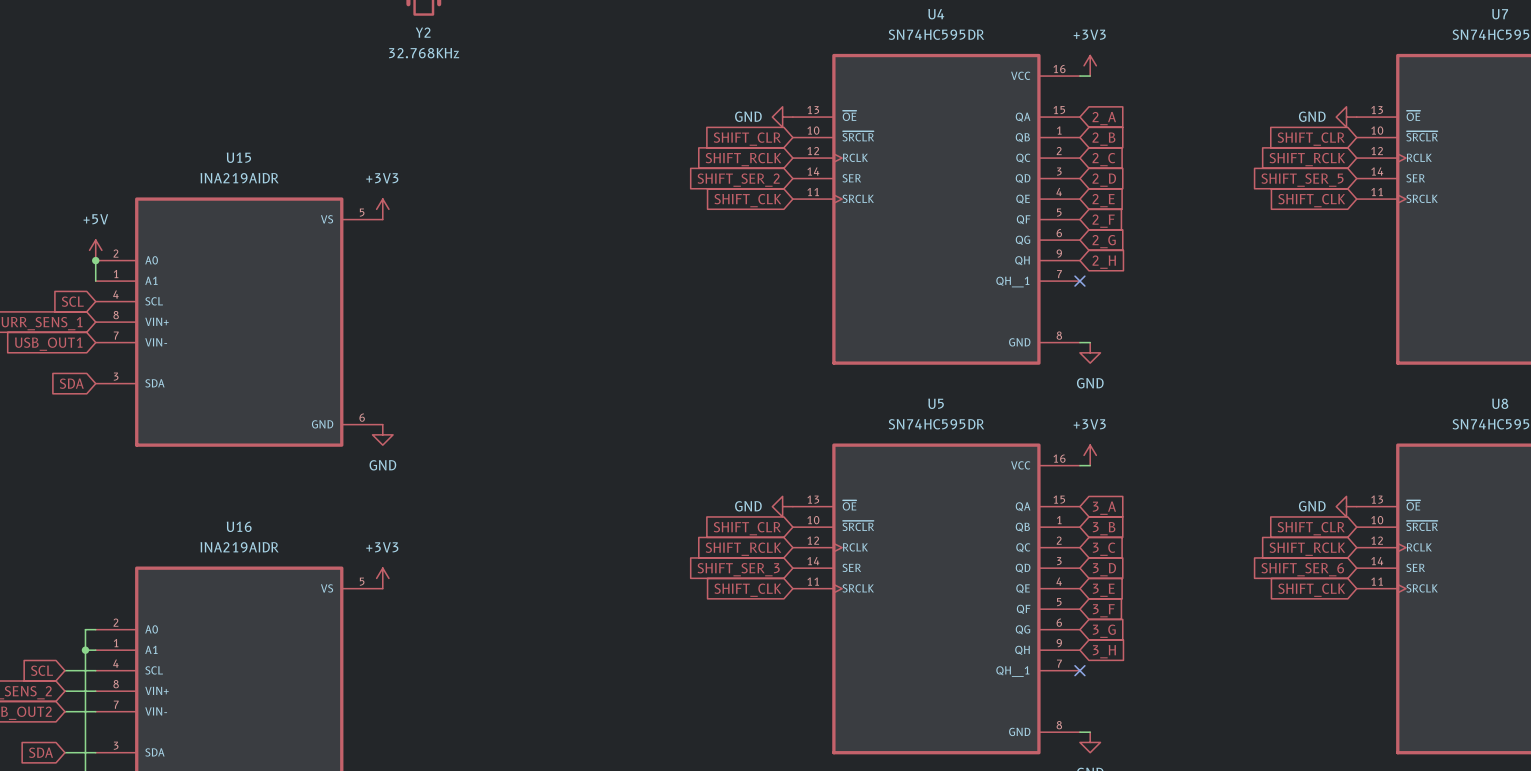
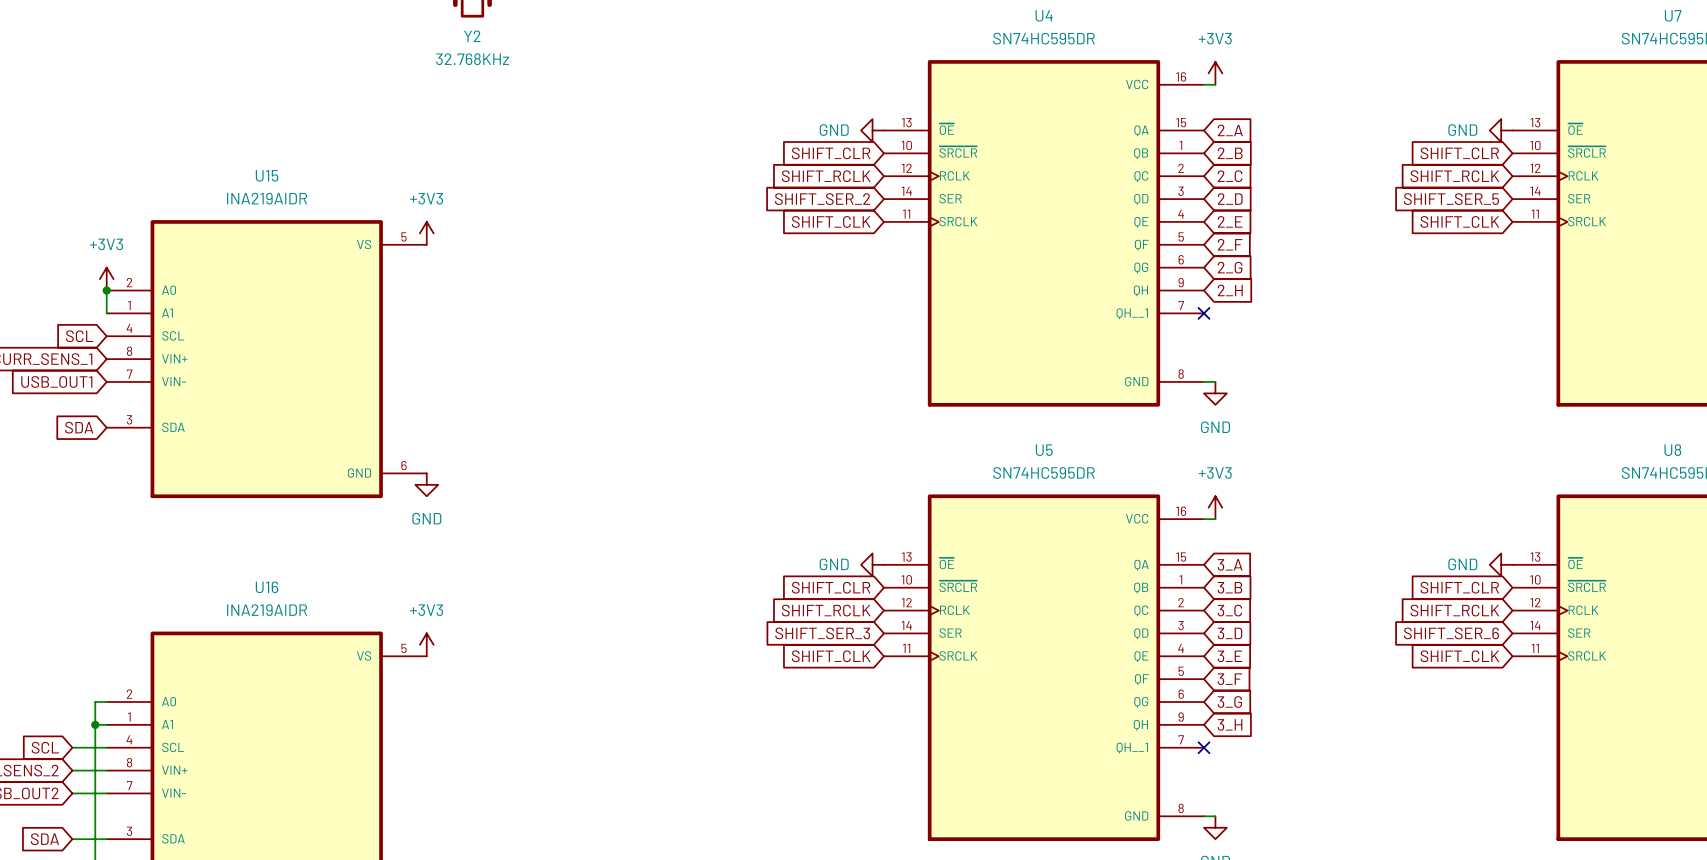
power symbol: +5V (95, 250) -> +3V3 (106, 279)

